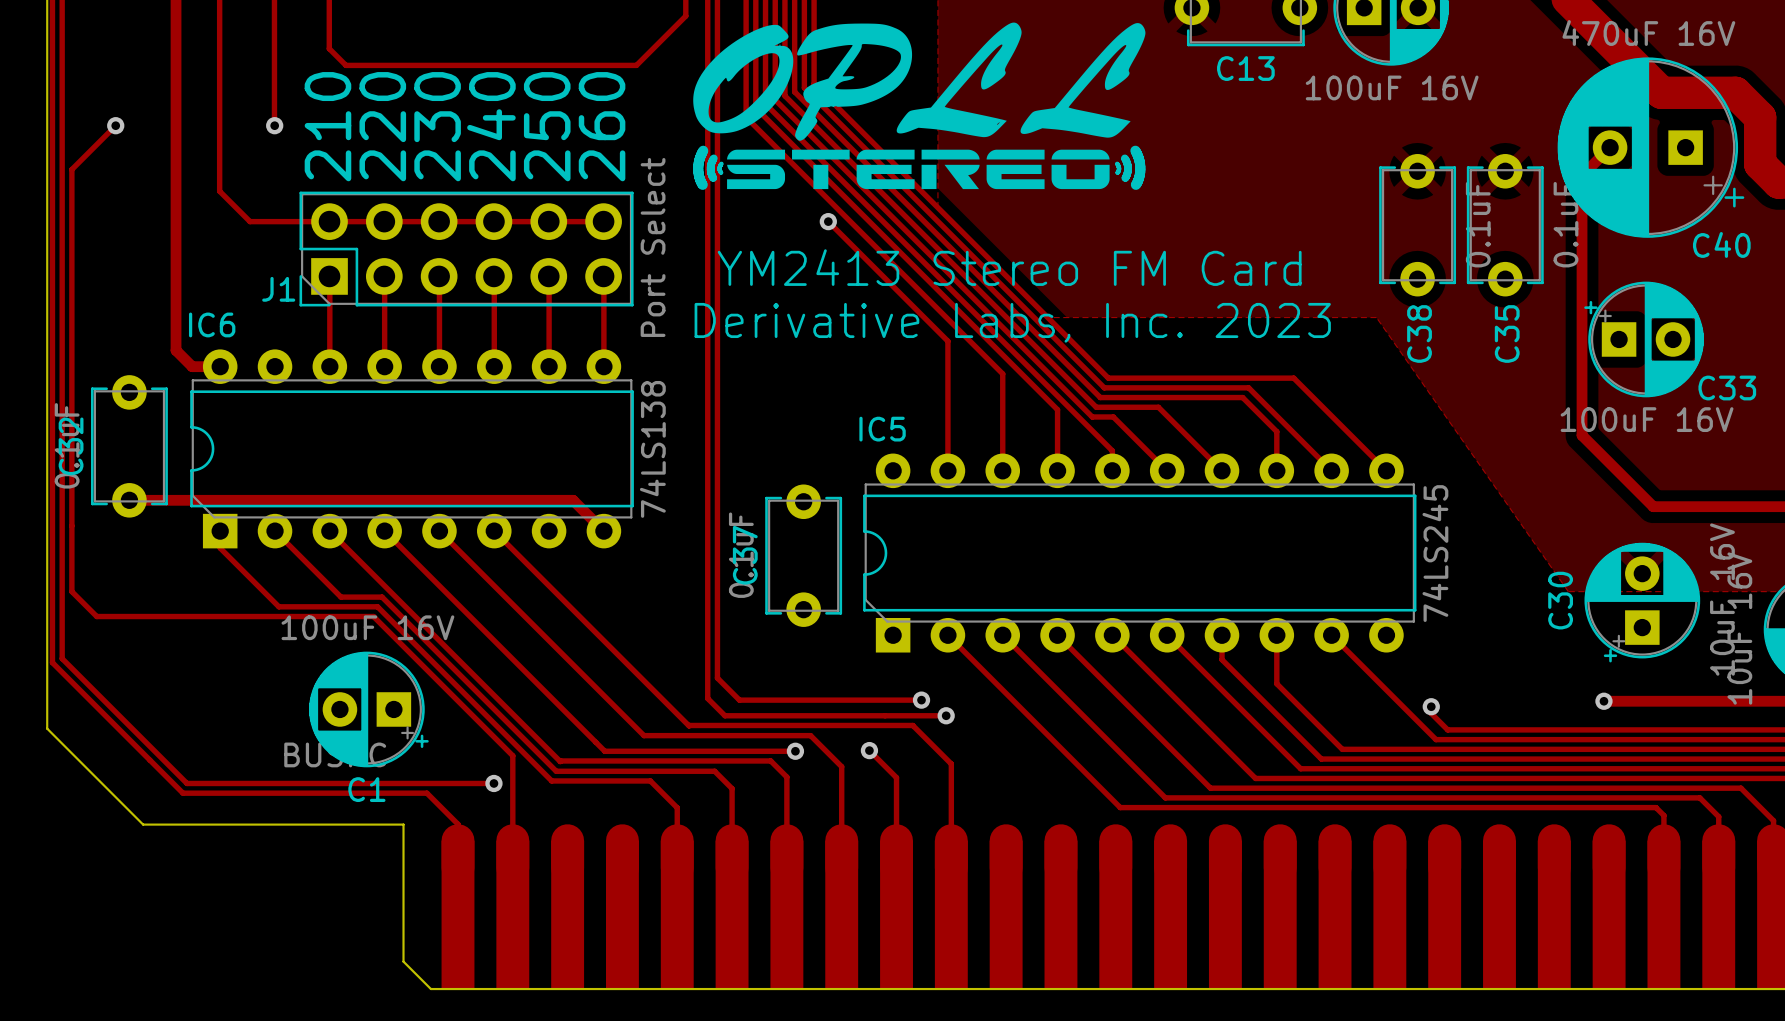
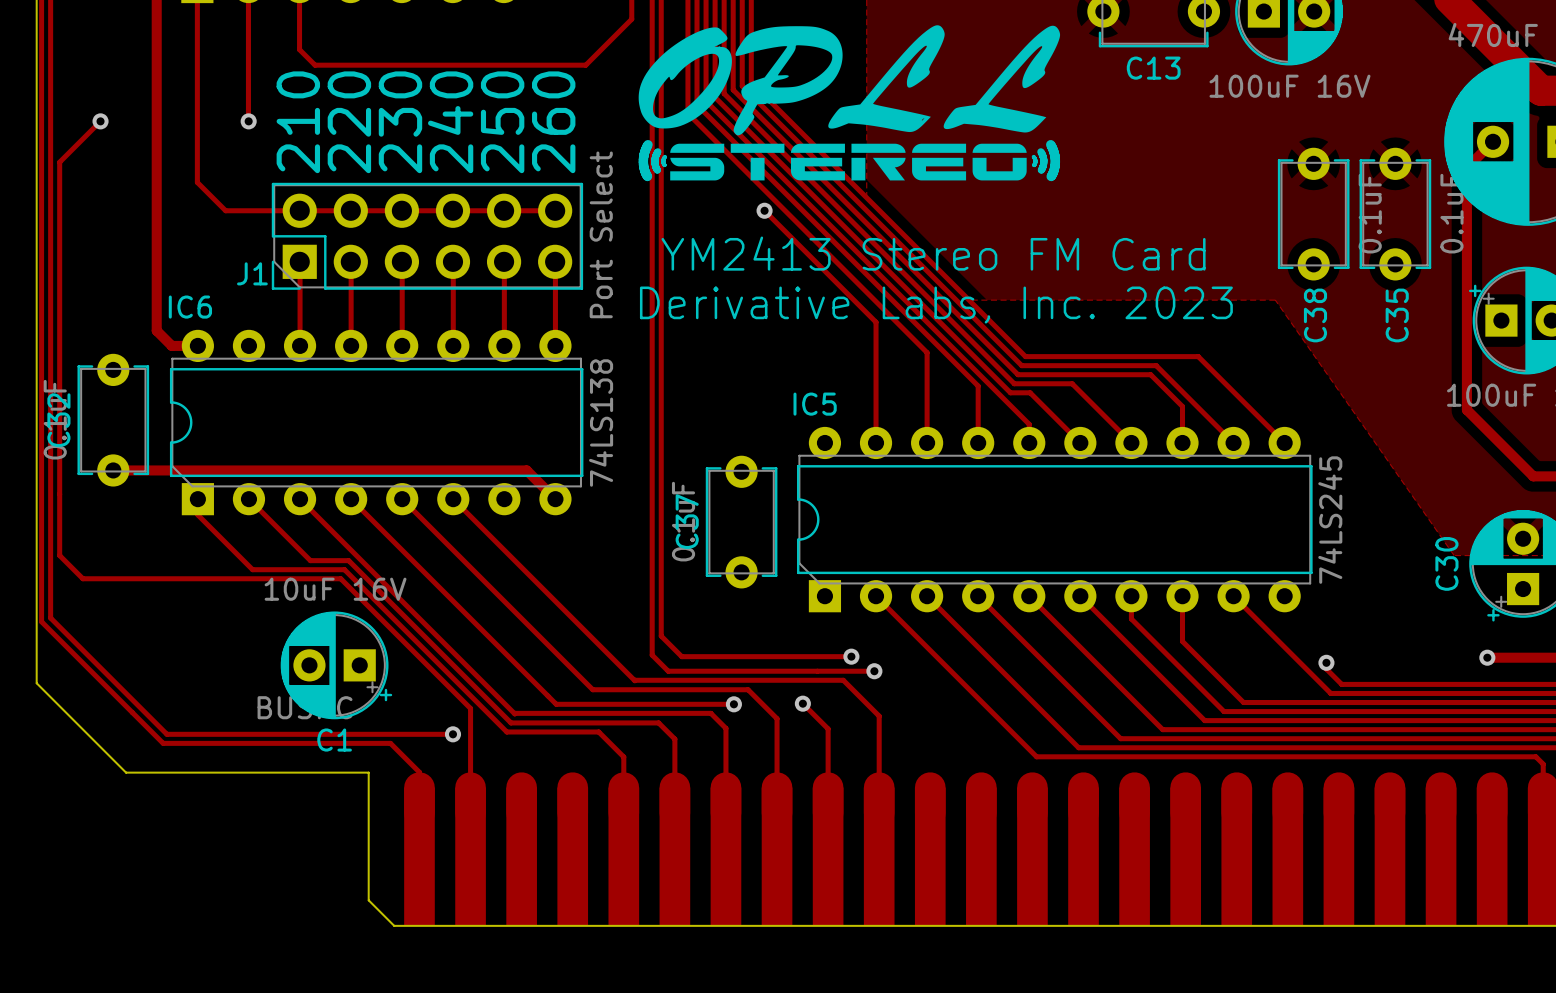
C1 value: 100uF 16V (367, 627) -> 10uF 16V (335, 589)

